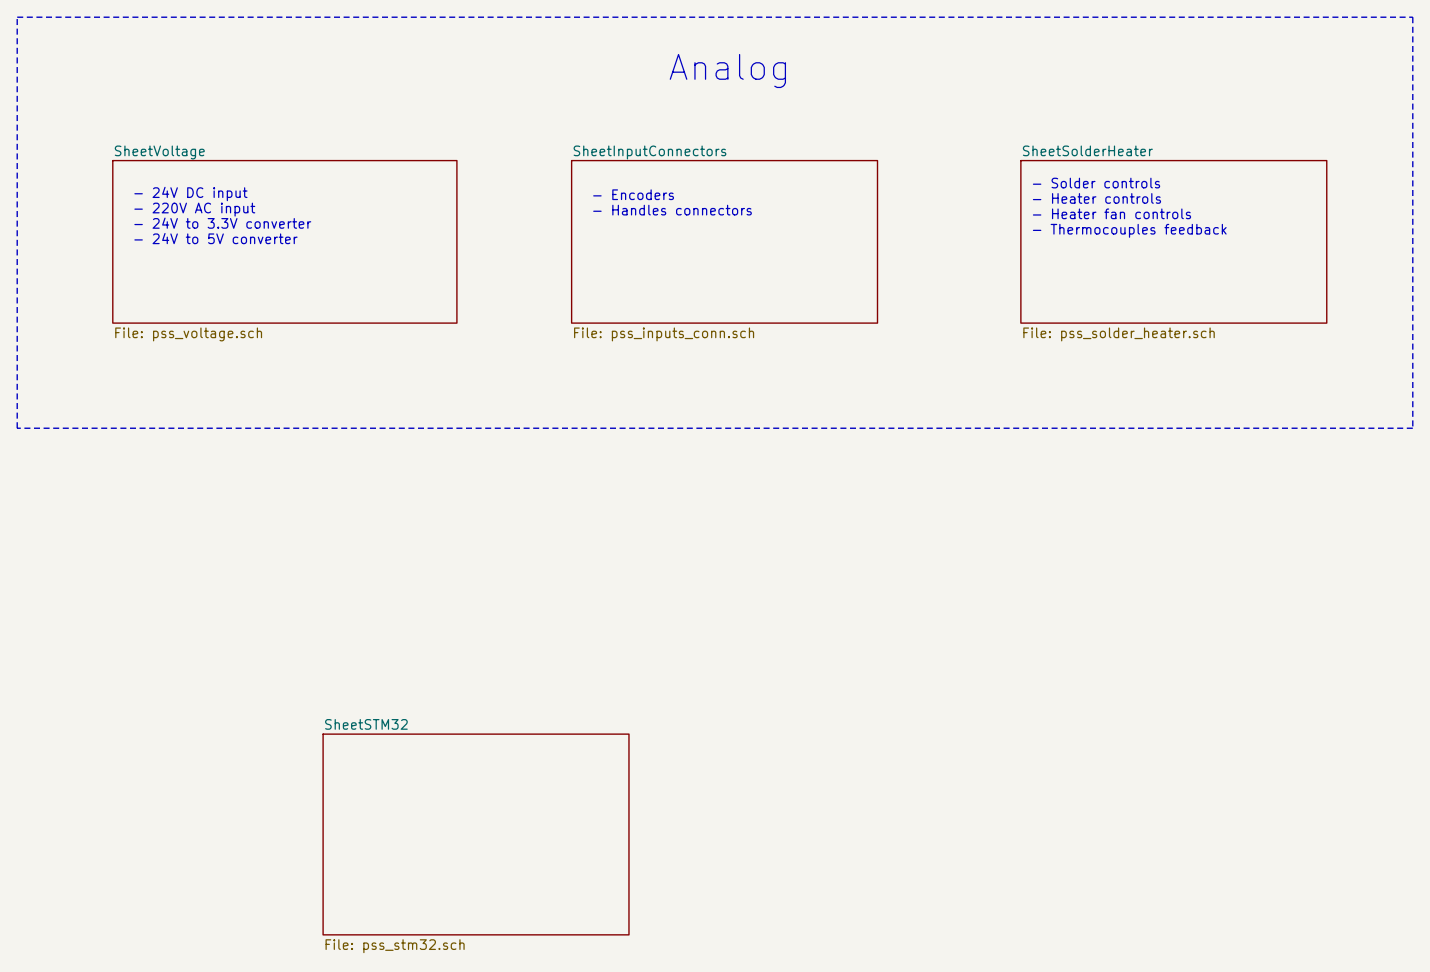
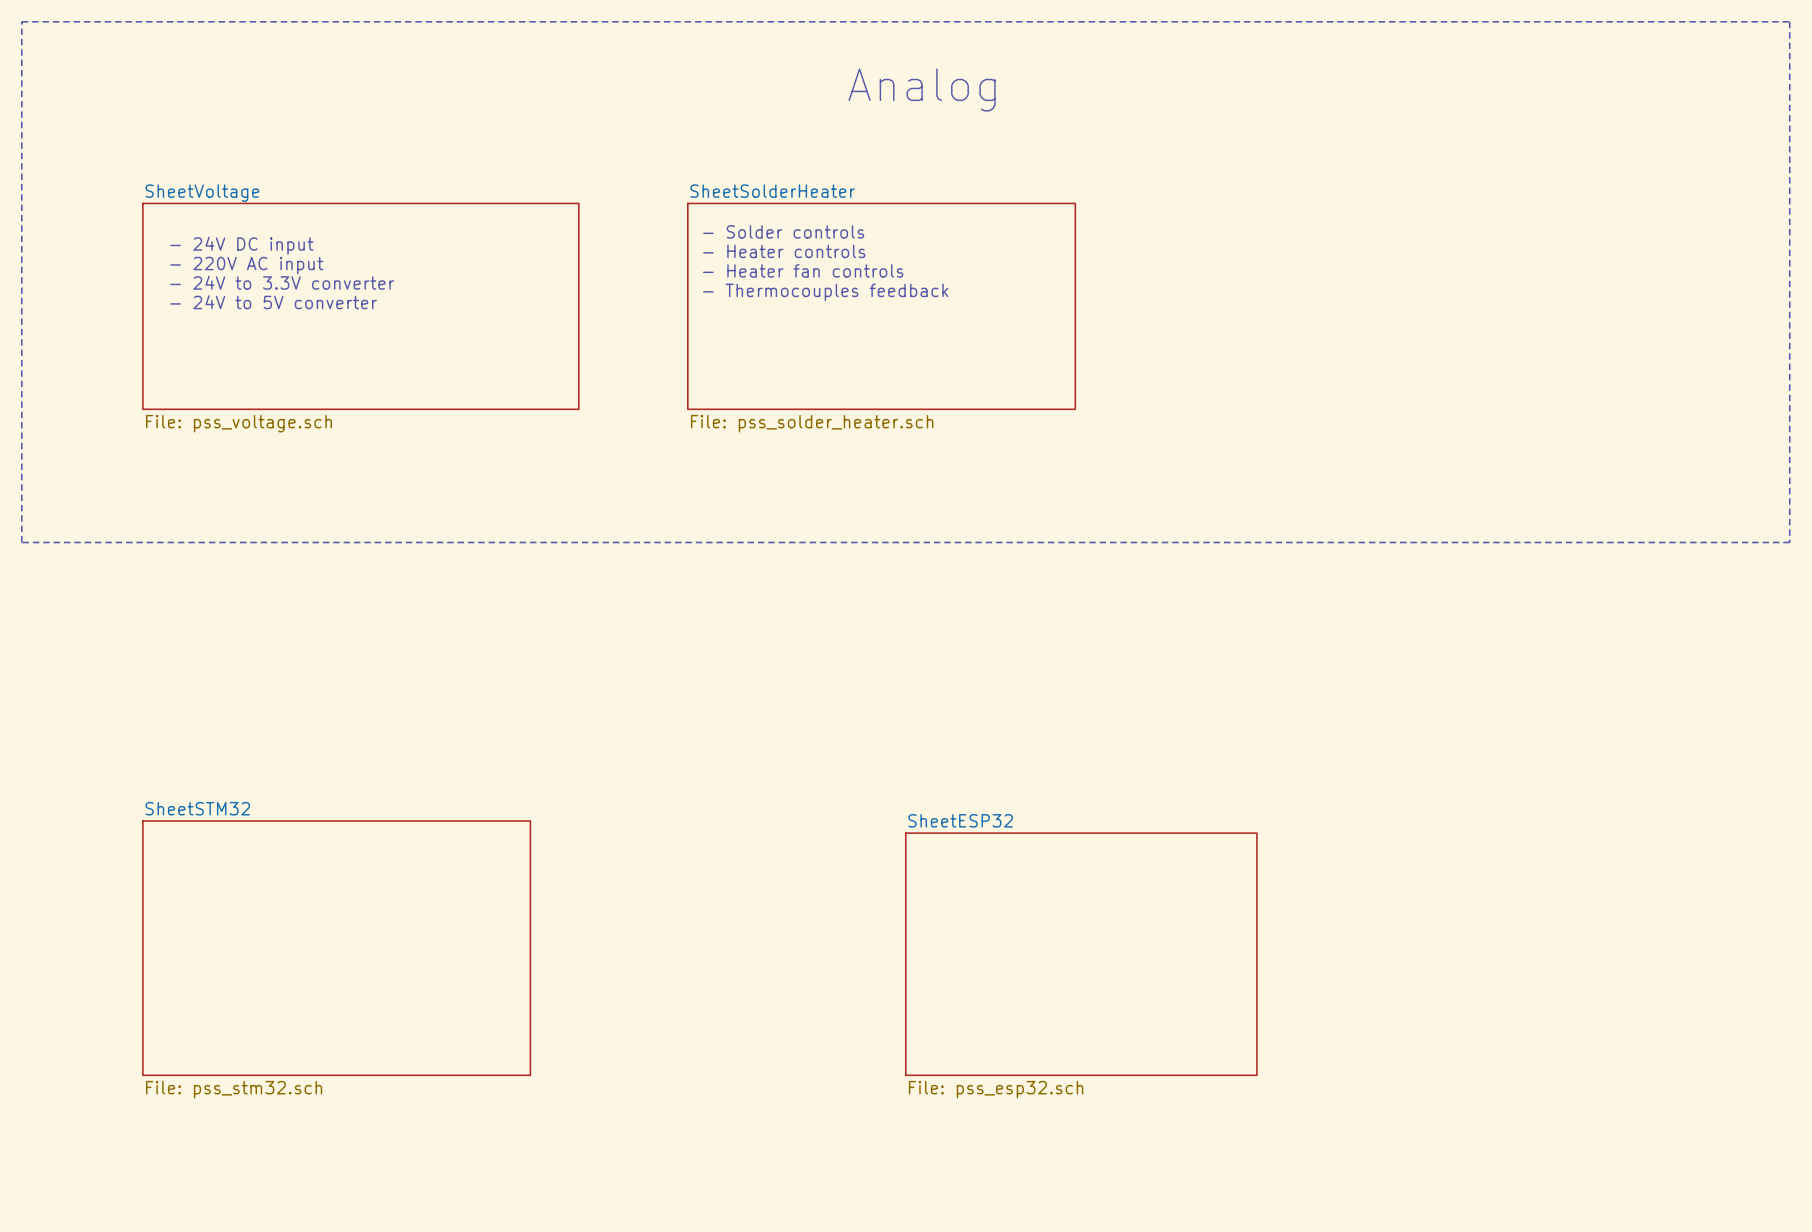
text: none -> - Solder controls (783, 231)
text: - Solder controls (1096, 183) -> none
text: - Encoders (633, 194) -> none
text: - Heater controls (1096, 198) -> none
text: - Handles connectors (672, 210) -> - Heater controls (784, 251)
text: none -> - Heater fan controls (803, 270)
text: - Heater fan controls (1111, 213) -> none
text: none -> - Thermocouples feedback (825, 292)
text: - Thermocouples feedback (1129, 230) -> none
sheet SheetSolderHeater: none -> File: pss_solder_heater.sch (881, 306)
sheet SheetInputConnectors: File: pss_inputs_conn.sch (724, 241) -> none
sheet SheetSolderHeater: File: pss_solder_heater.sch (1173, 241) -> none
sheet SheetESP32: none -> File: pss_esp32.sch (1081, 954)
sheet SheetSTM32 position: (476, 834) -> (336, 948)

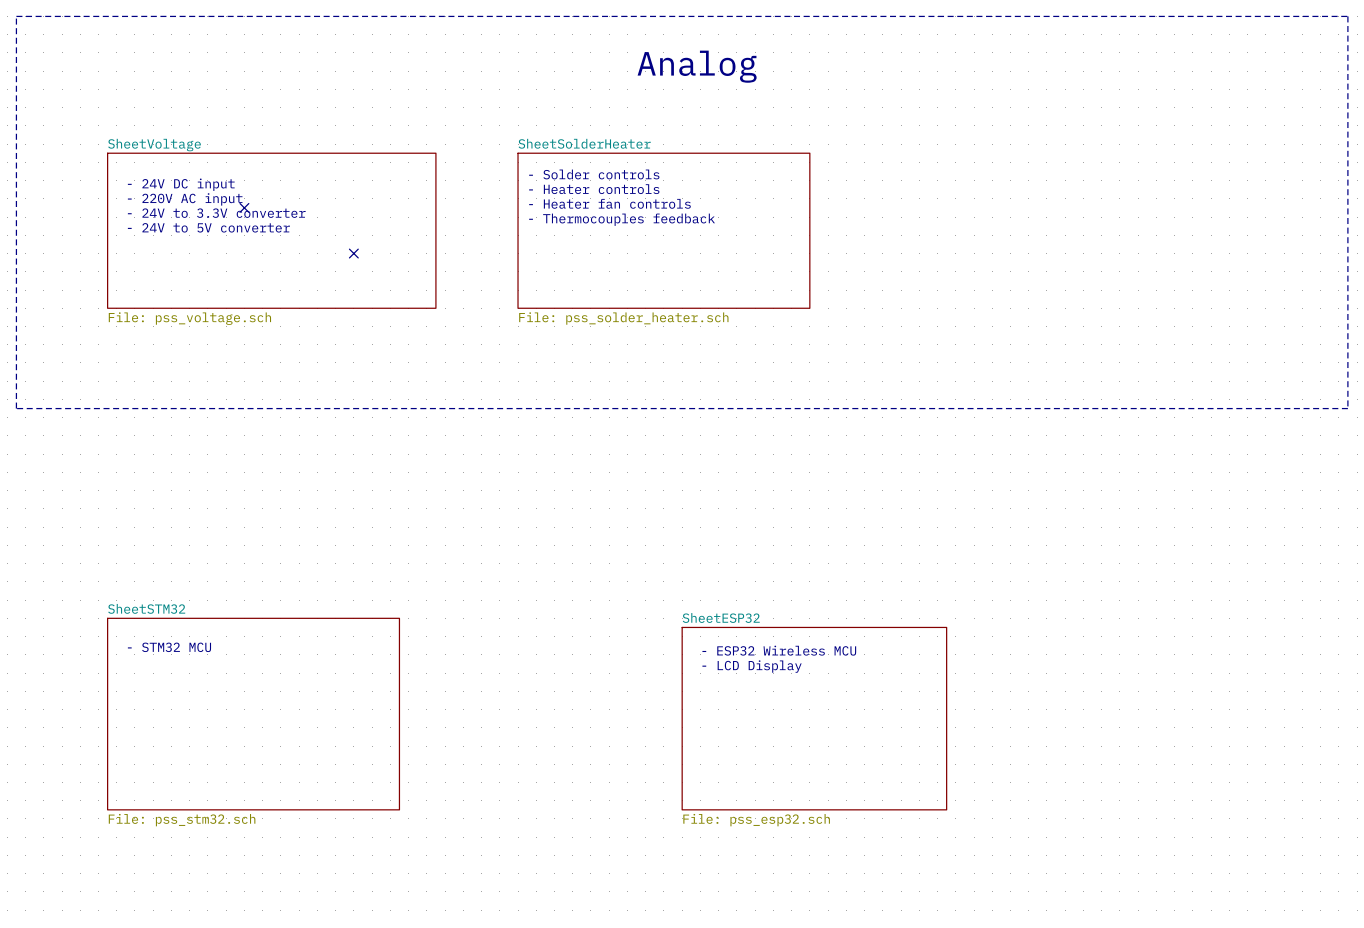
no-connect mark: none -> (244, 207)
no-connect mark: none -> (353, 253)
text: none -> - STM32 MCU (169, 647)
text: none -> - ESP32 Wireless MCU (779, 650)
text: none -> - LCD Display (752, 666)

